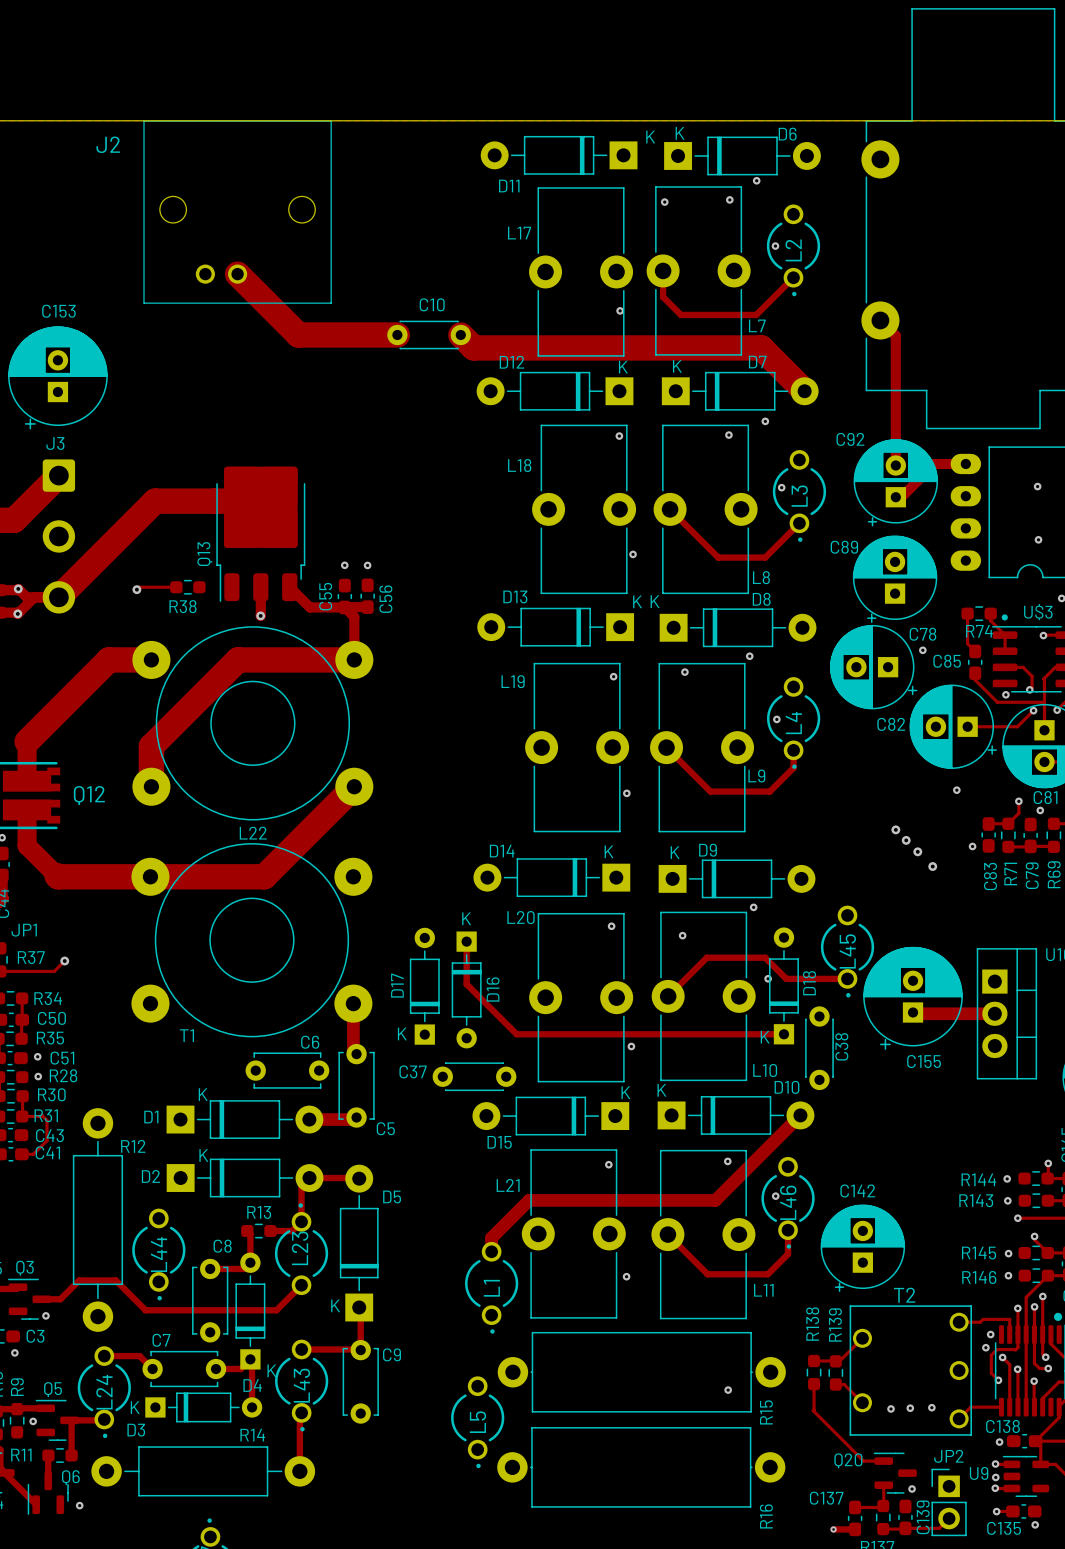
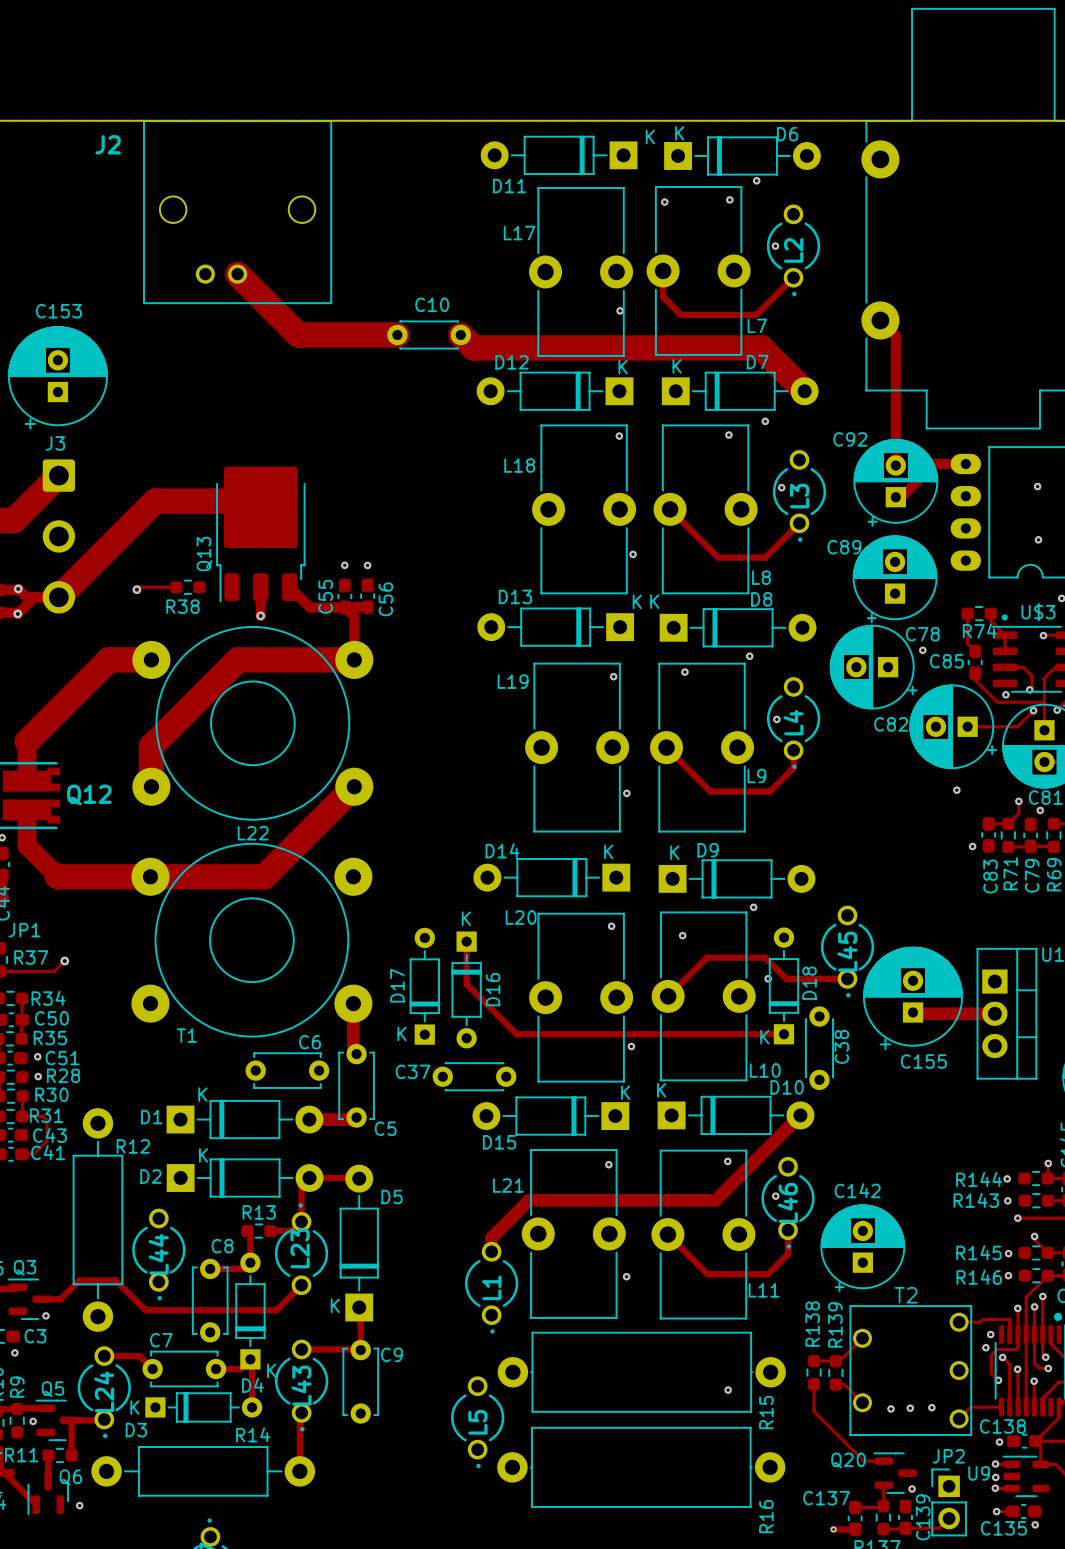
via: (895, 829) -> none
via: (906, 840) -> none
via: (917, 851) -> none
via: (932, 866) -> none

